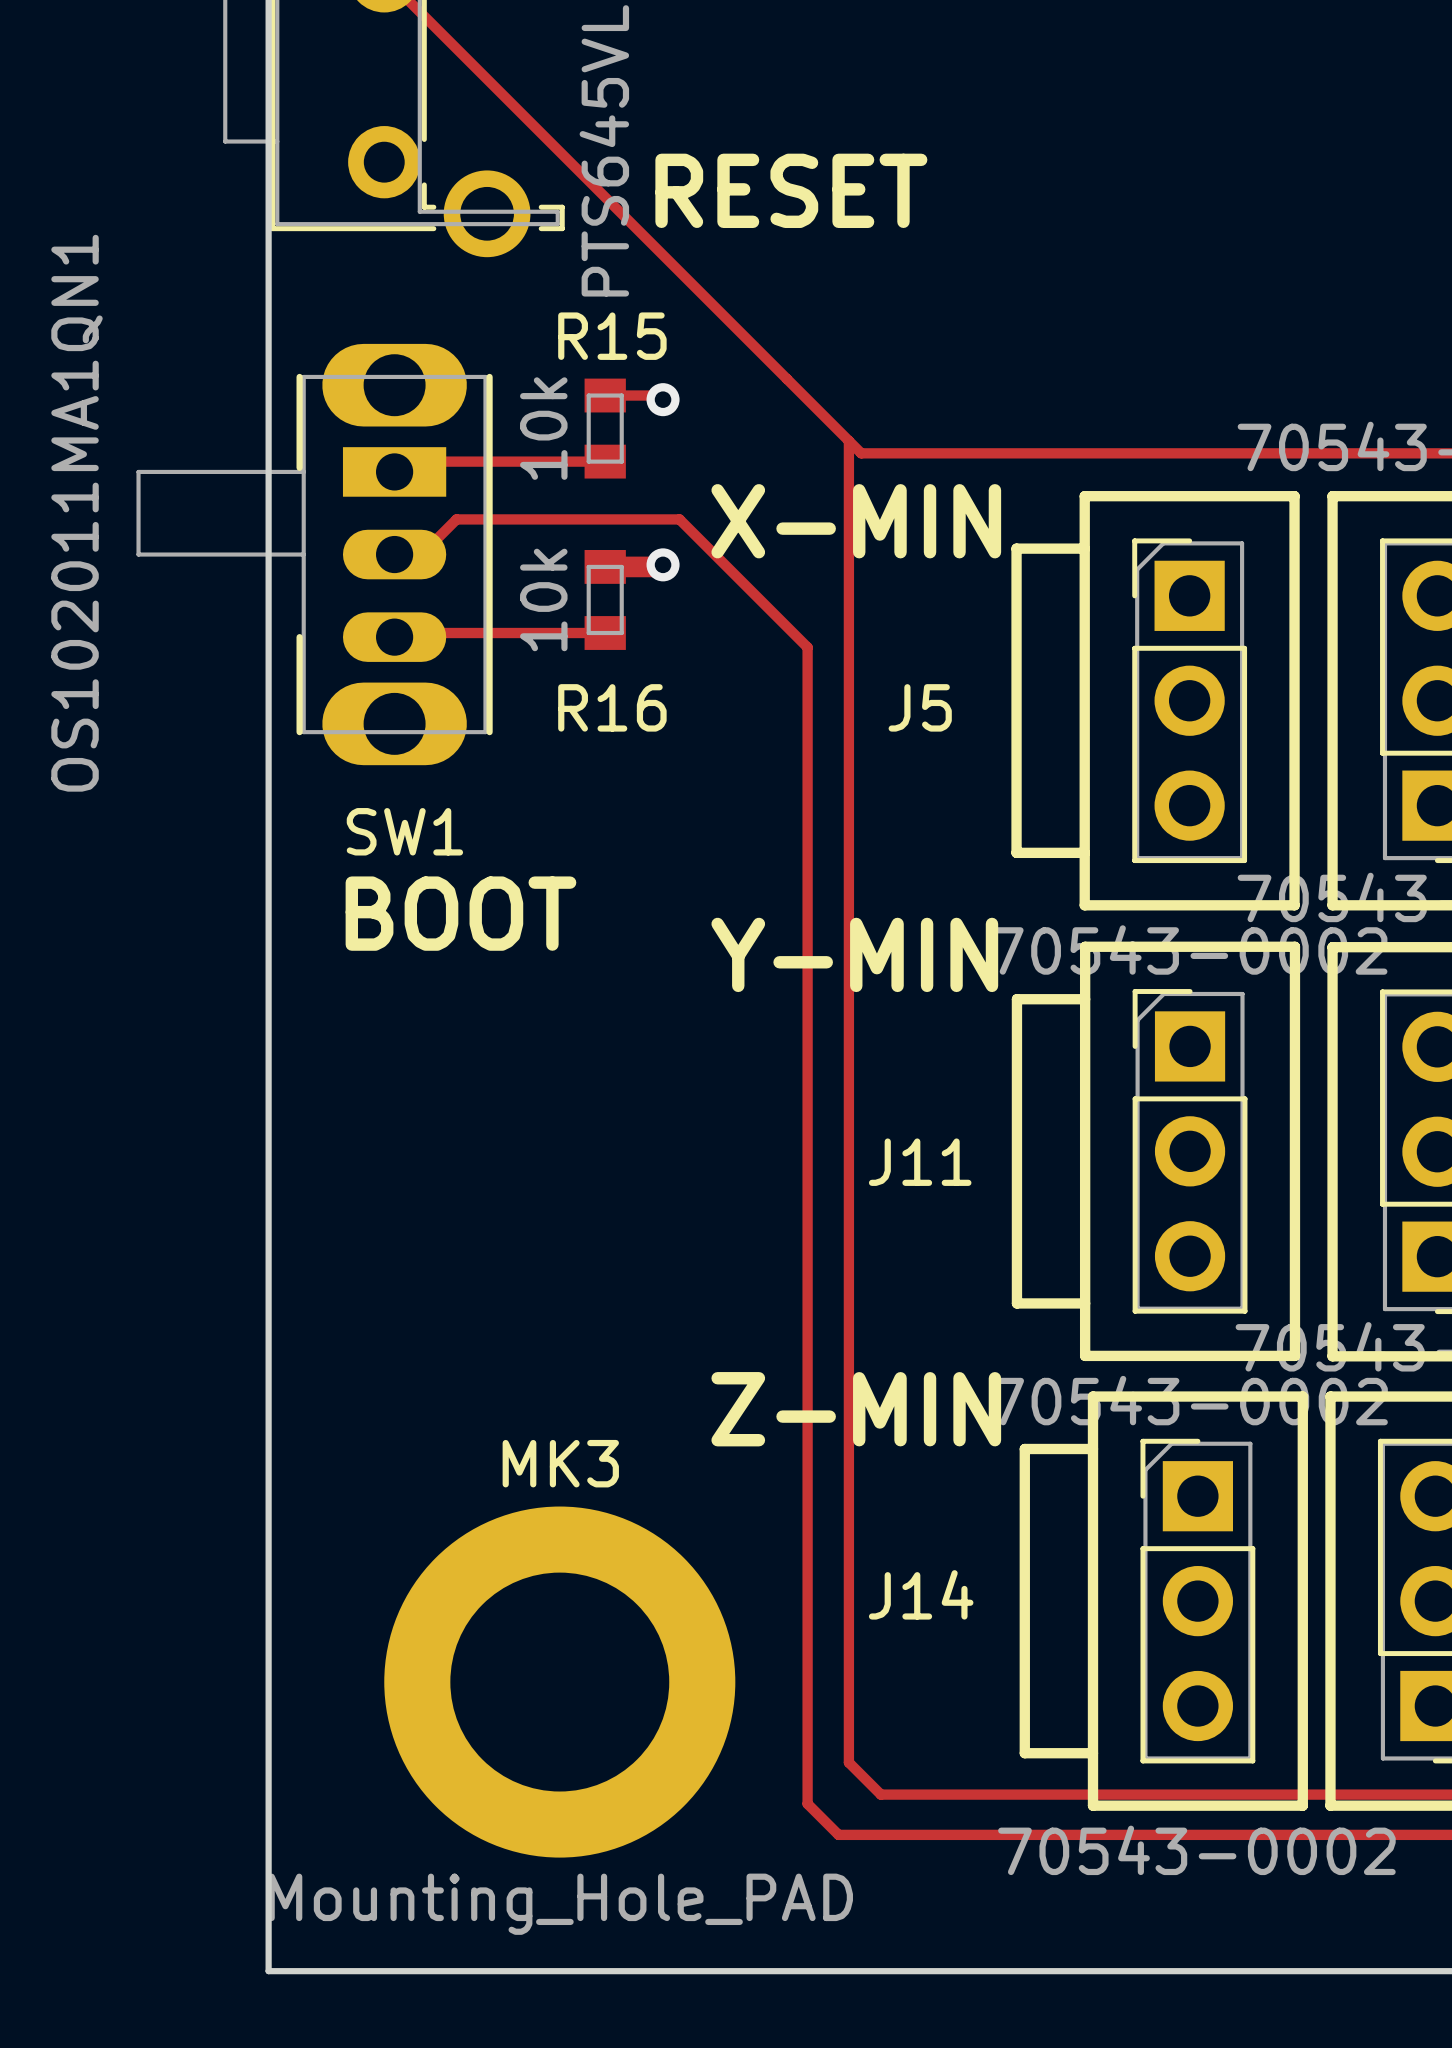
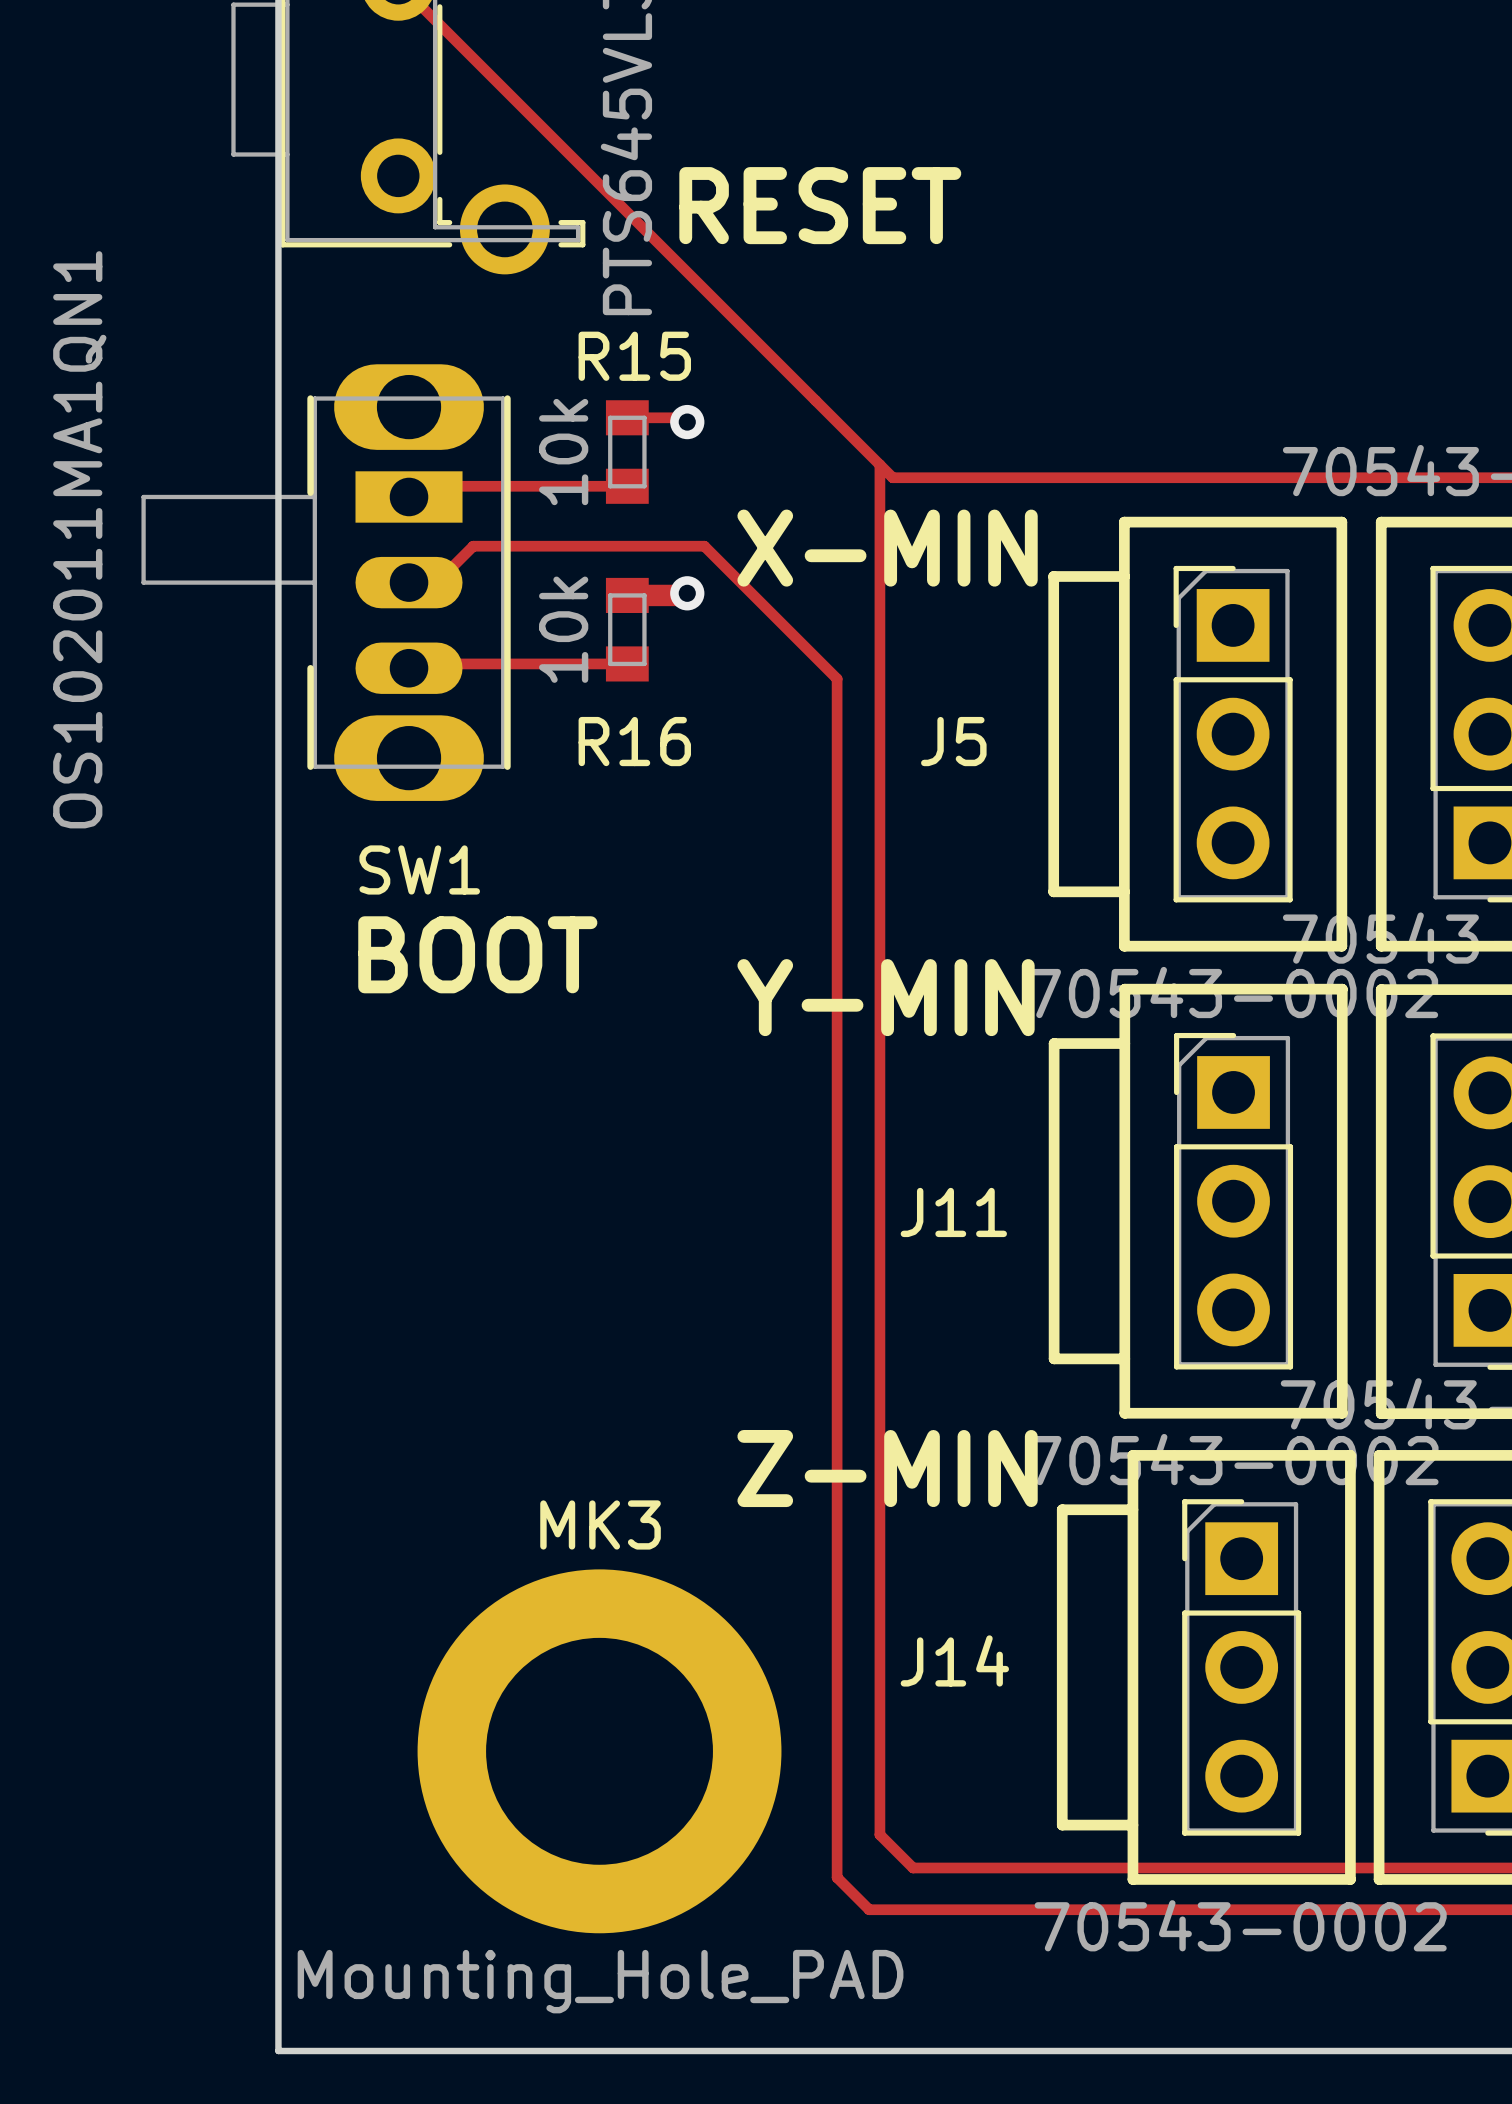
MK3 position: (559, 1682) -> (599, 1751)

